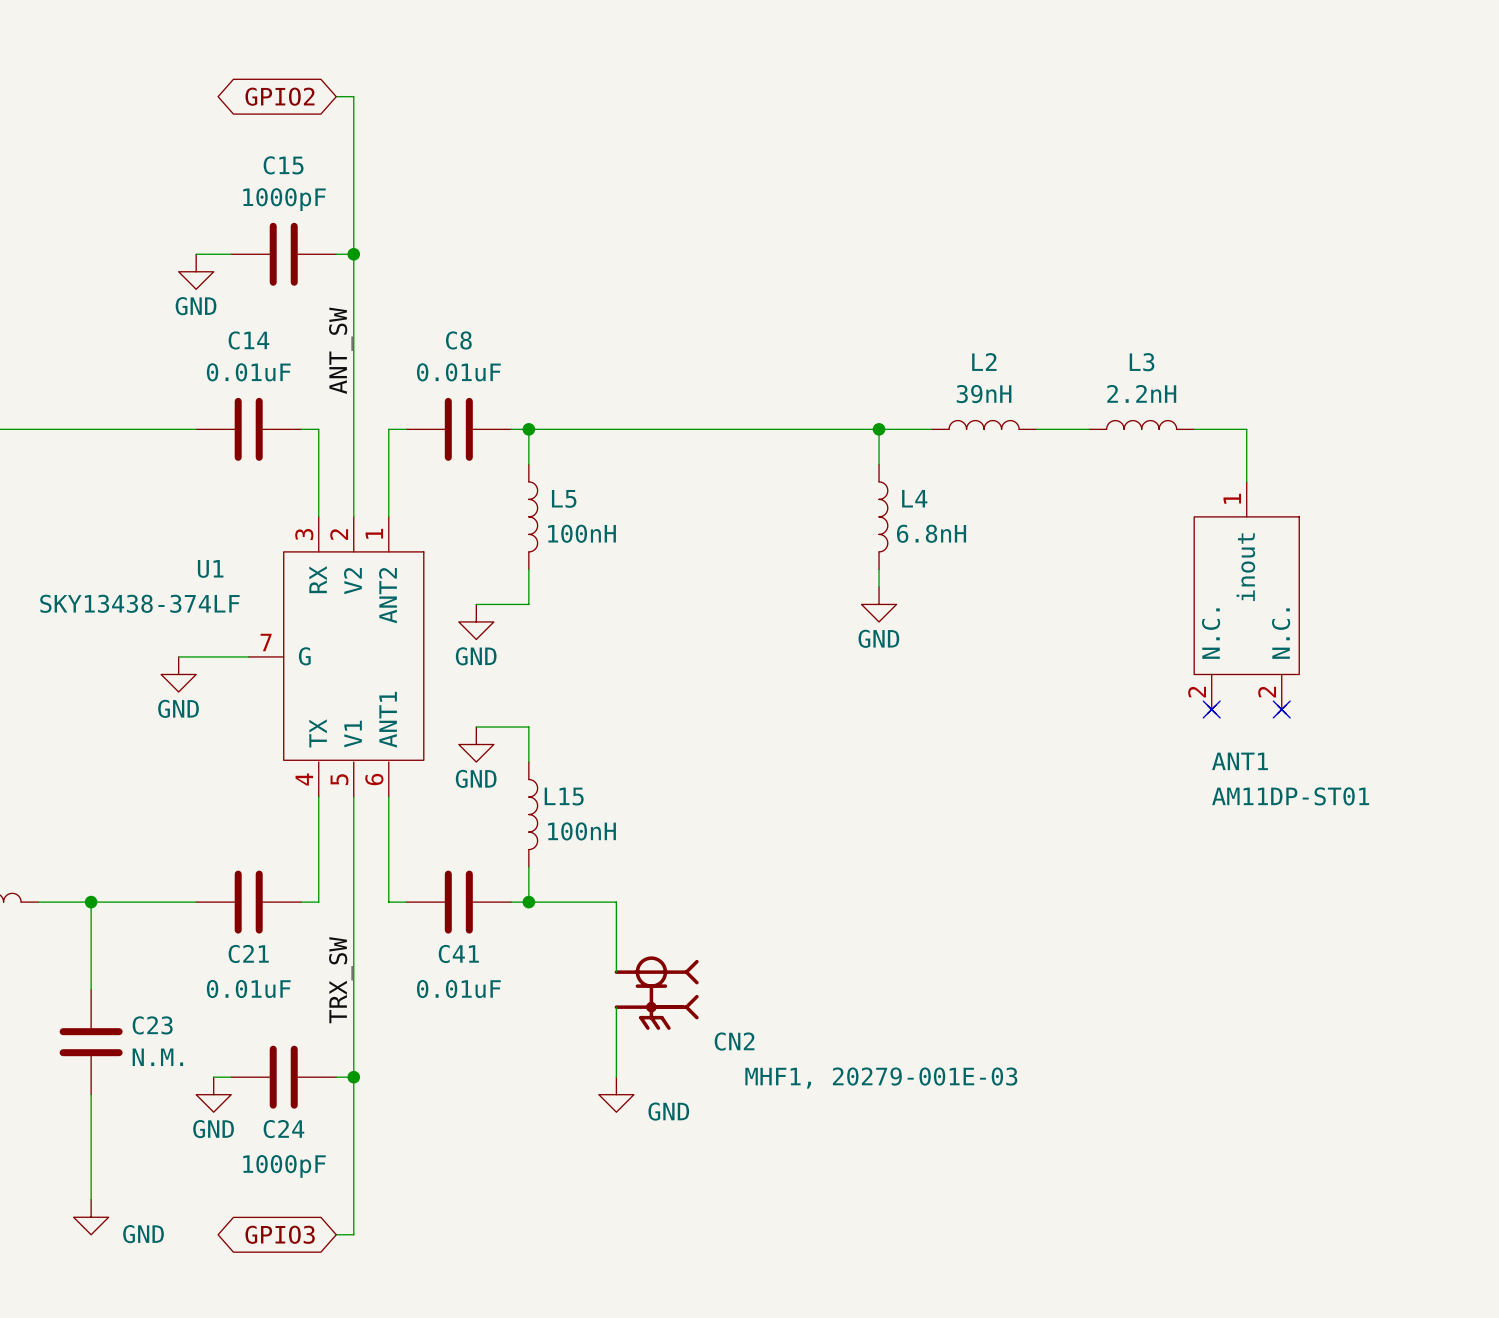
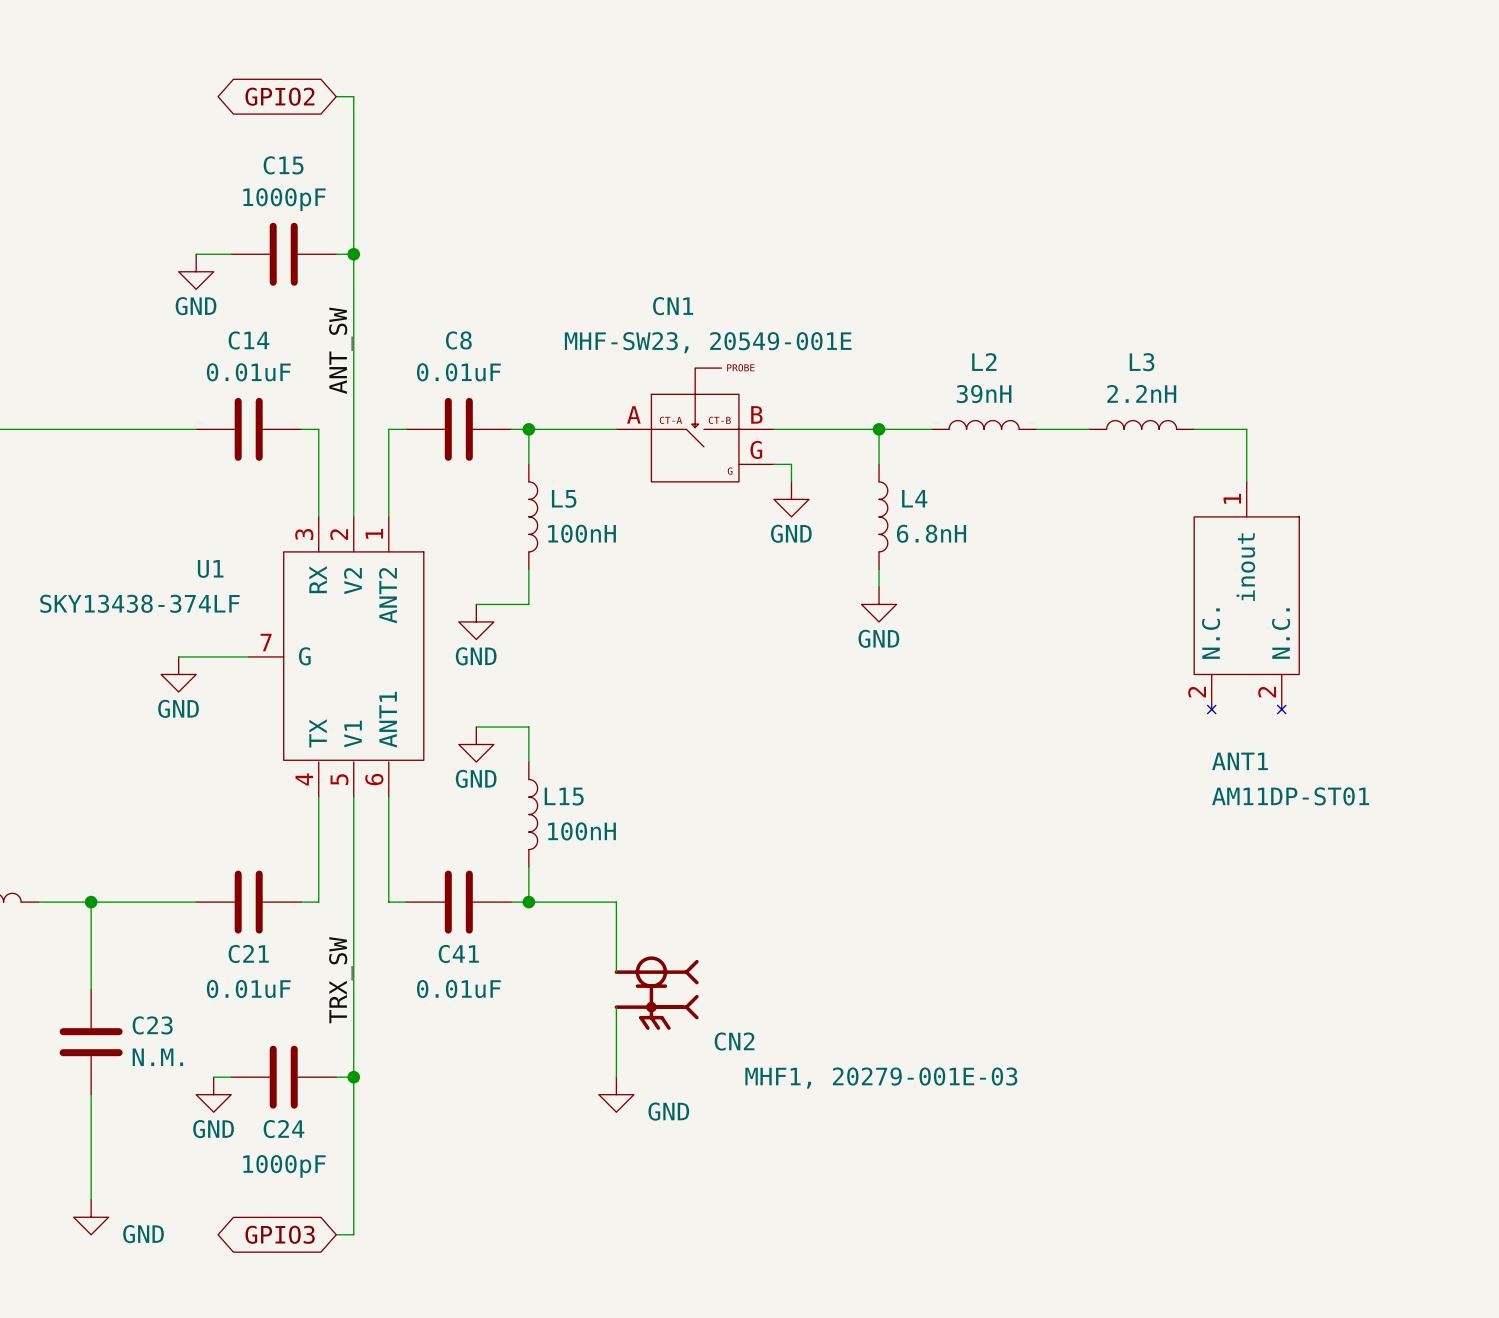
CN1: none -> MHF-SW23, 20549-001E (695, 424)
wire: none -> (773, 464) (791, 464) (791, 481)
power symbol: none -> GND (791, 499)
no-connect mark: (1211, 709) -> none
no-connect mark: (1281, 709) -> none

